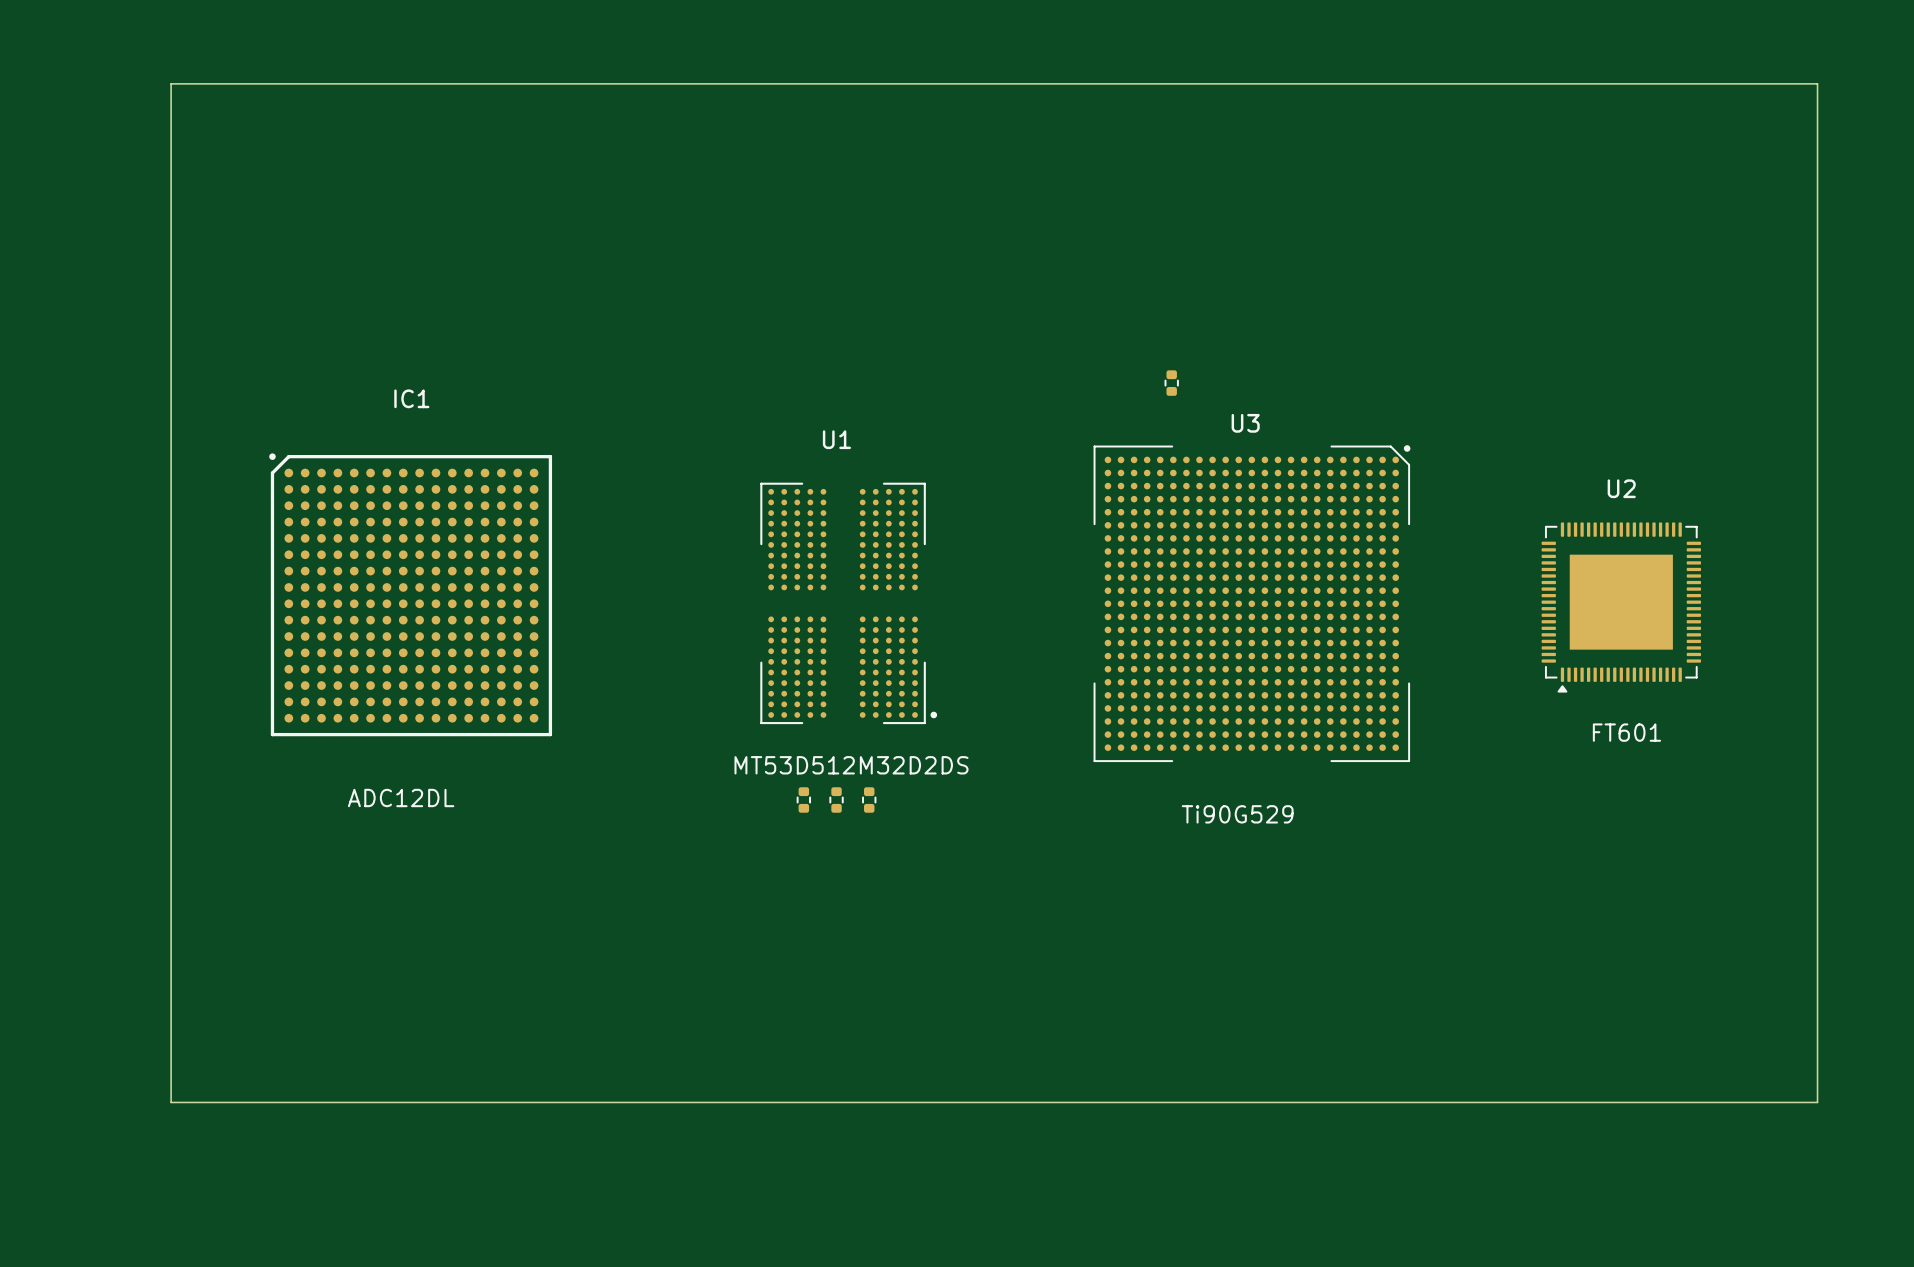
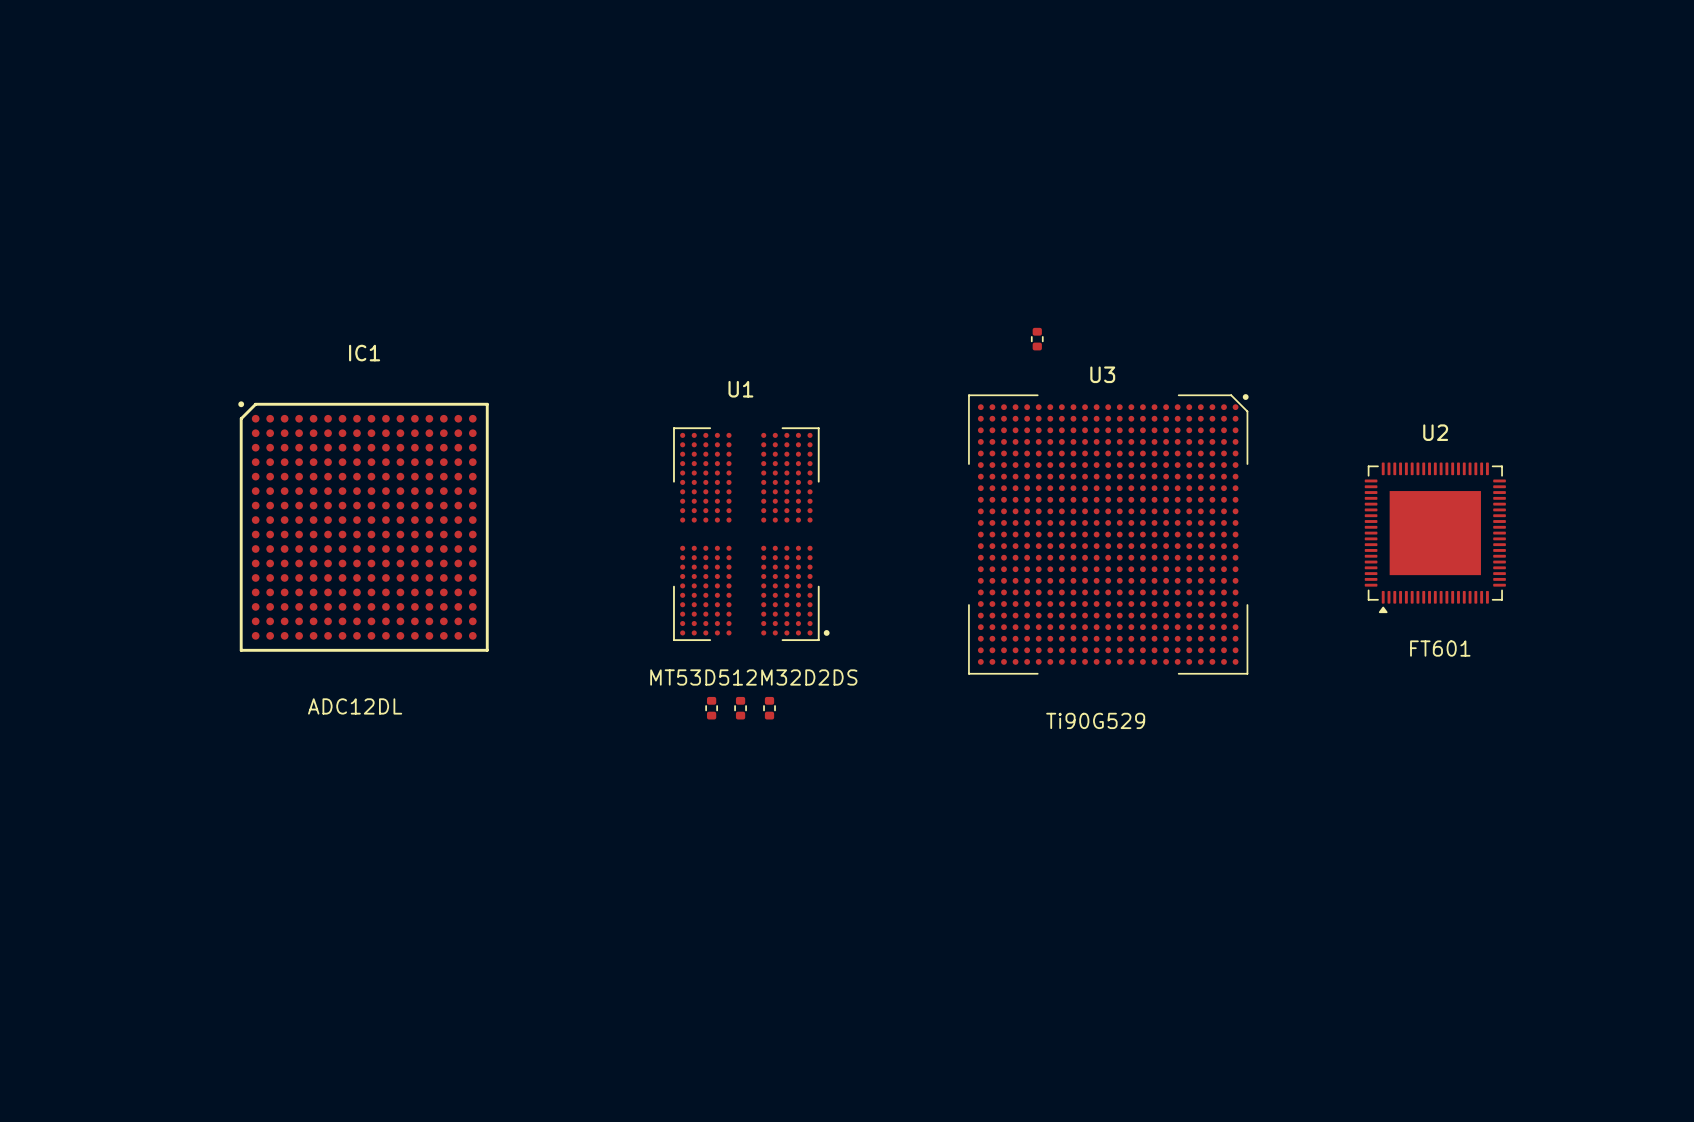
board edge: (171, 83) (1817, 83) (1817, 1102) (171, 1102) (171, 83) -> none

